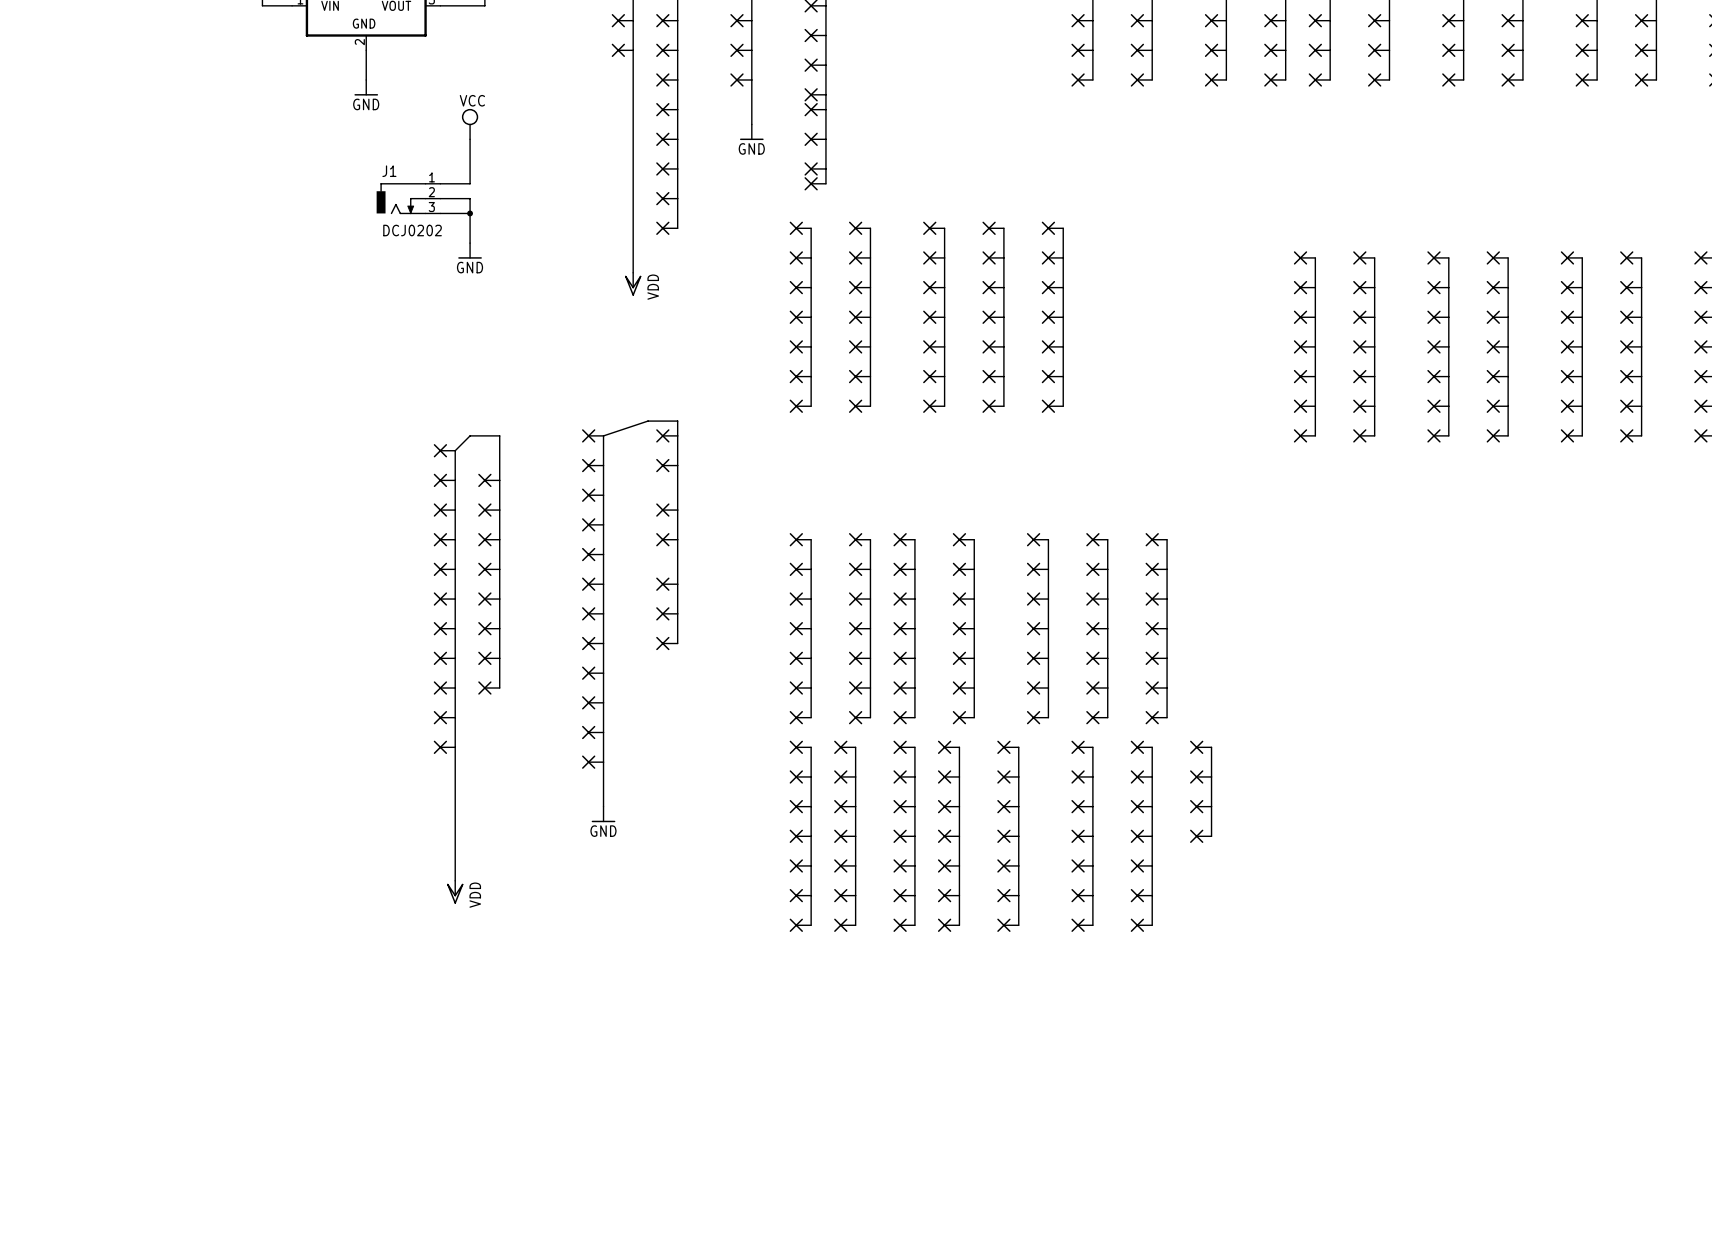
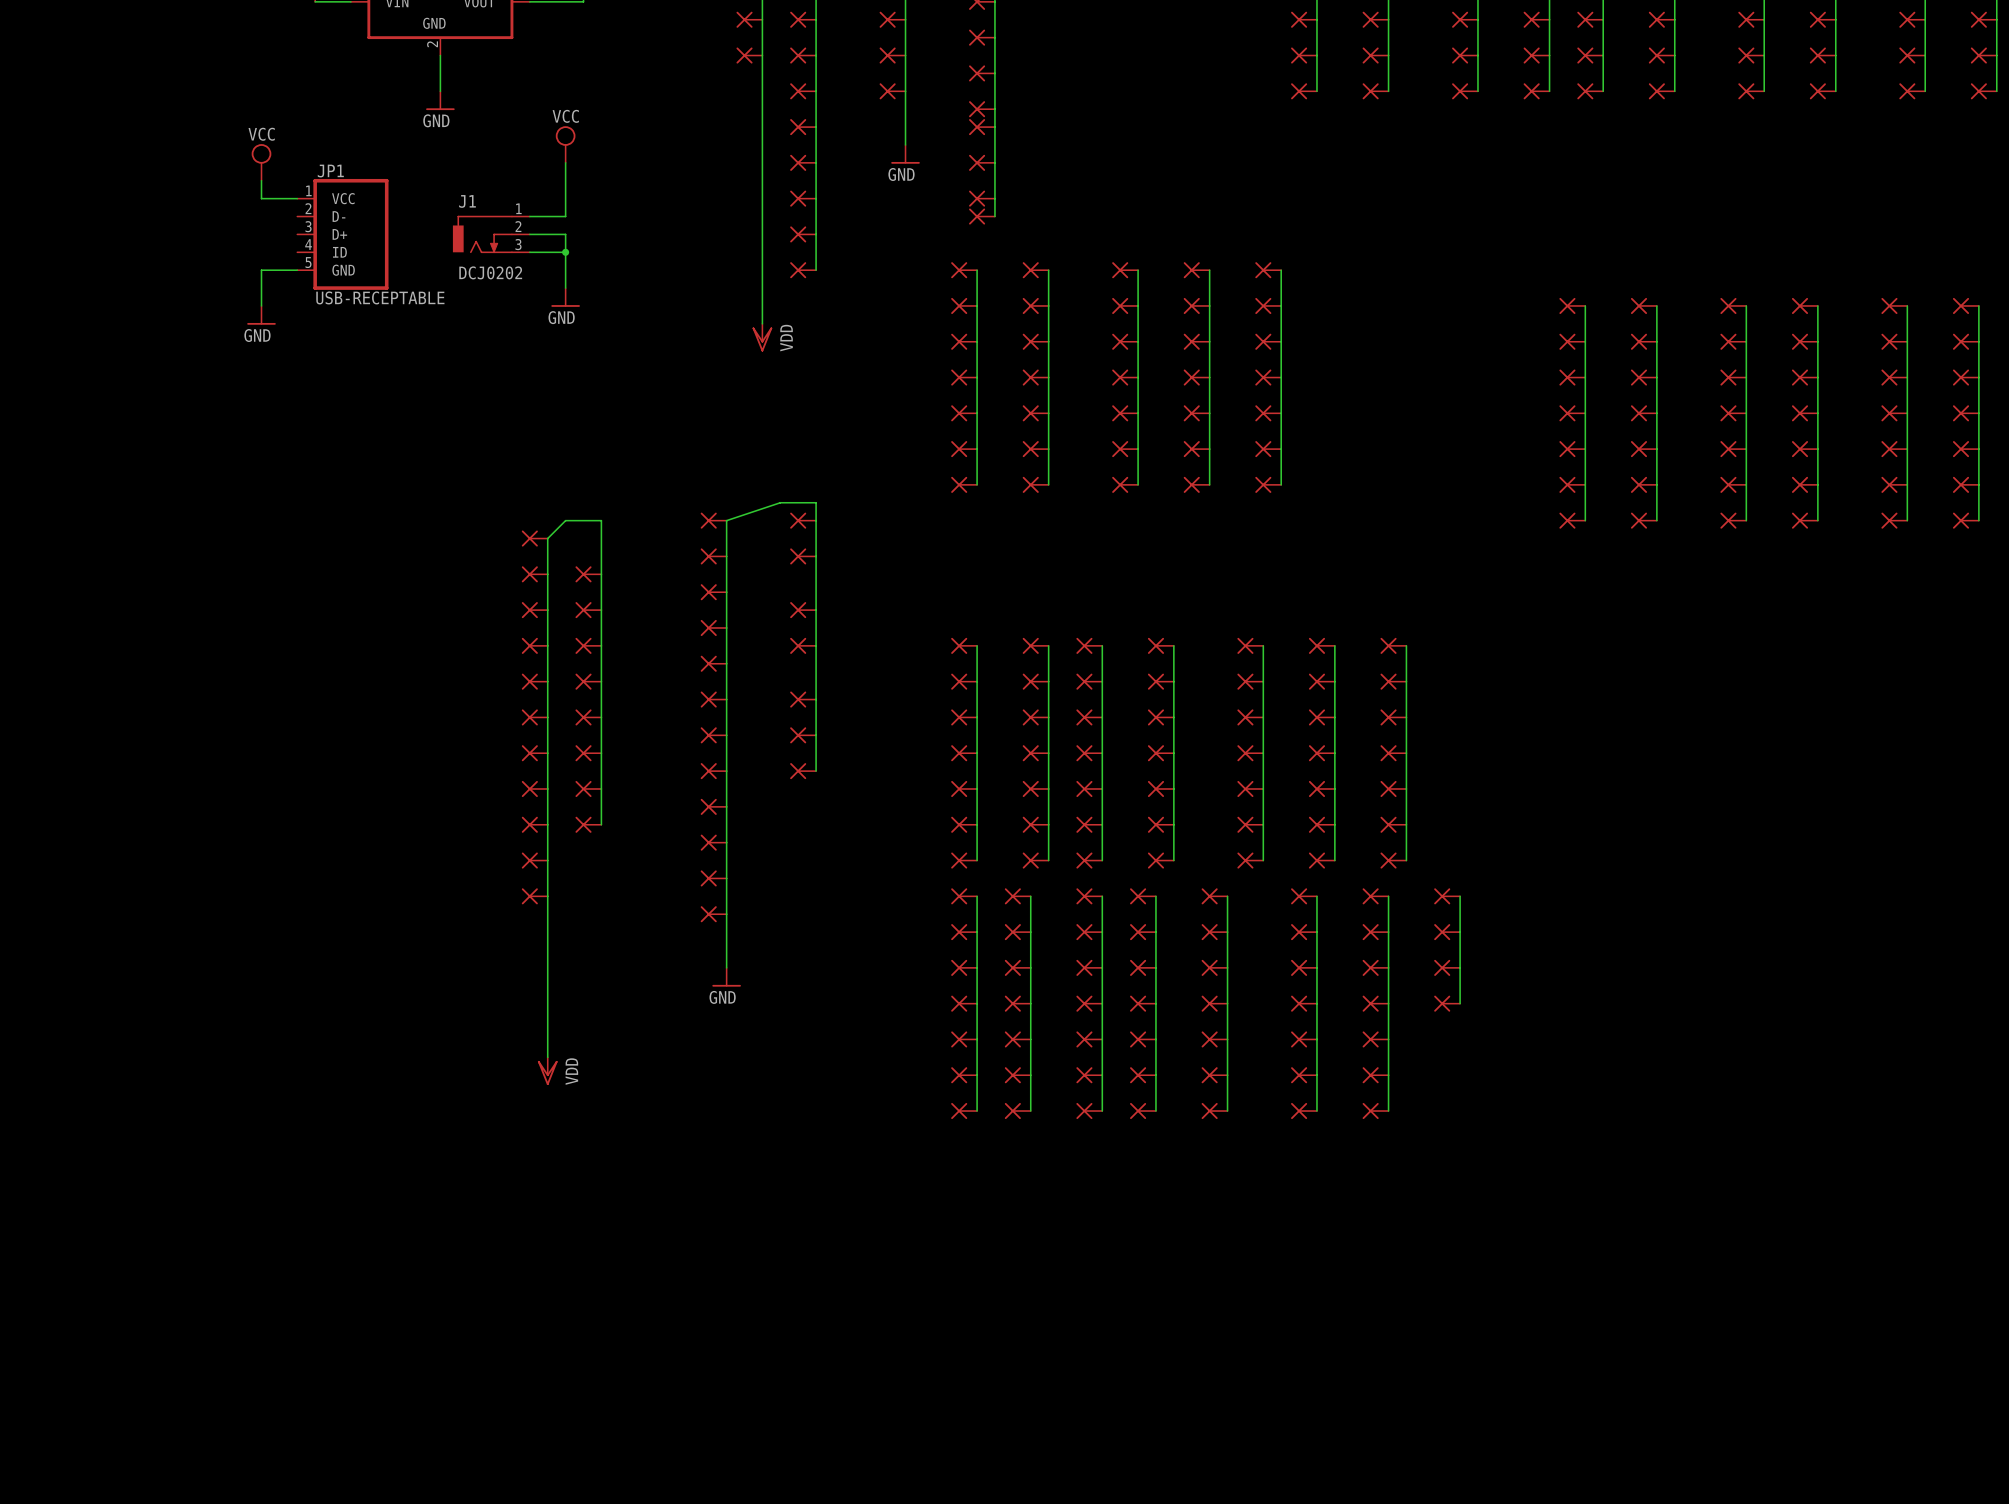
power symbol: none -> VCC (261, 162)
wire: none -> (261, 180) (261, 198) (297, 198)
JP1: none -> USB-RECEPTABLE (342, 234)
wire: none -> (297, 270) (261, 270) (261, 305)
power symbol: none -> GND (261, 315)

